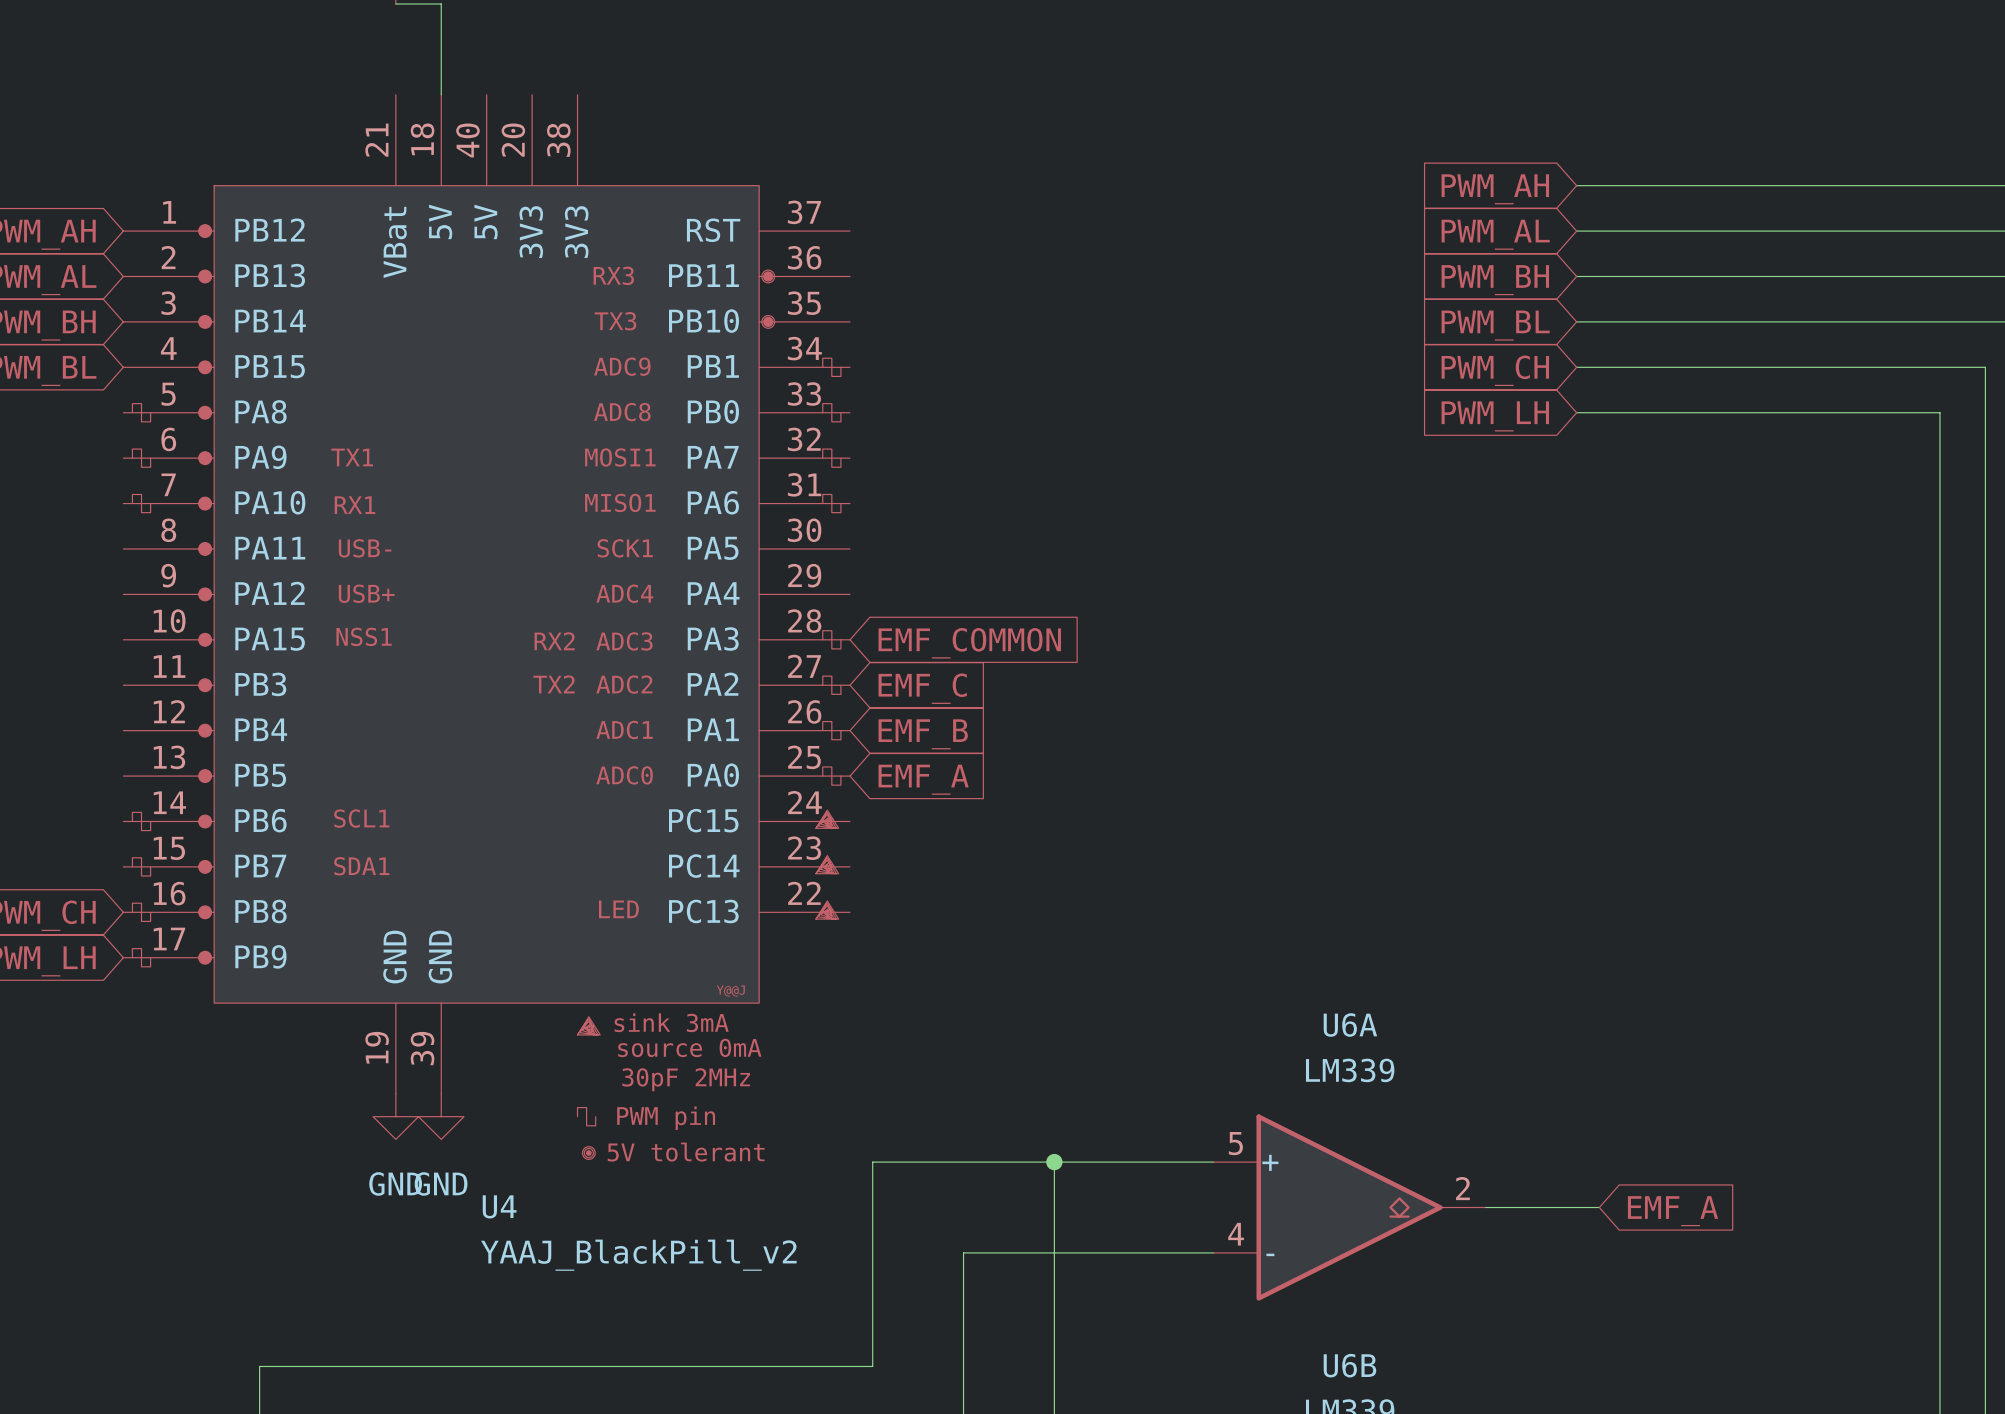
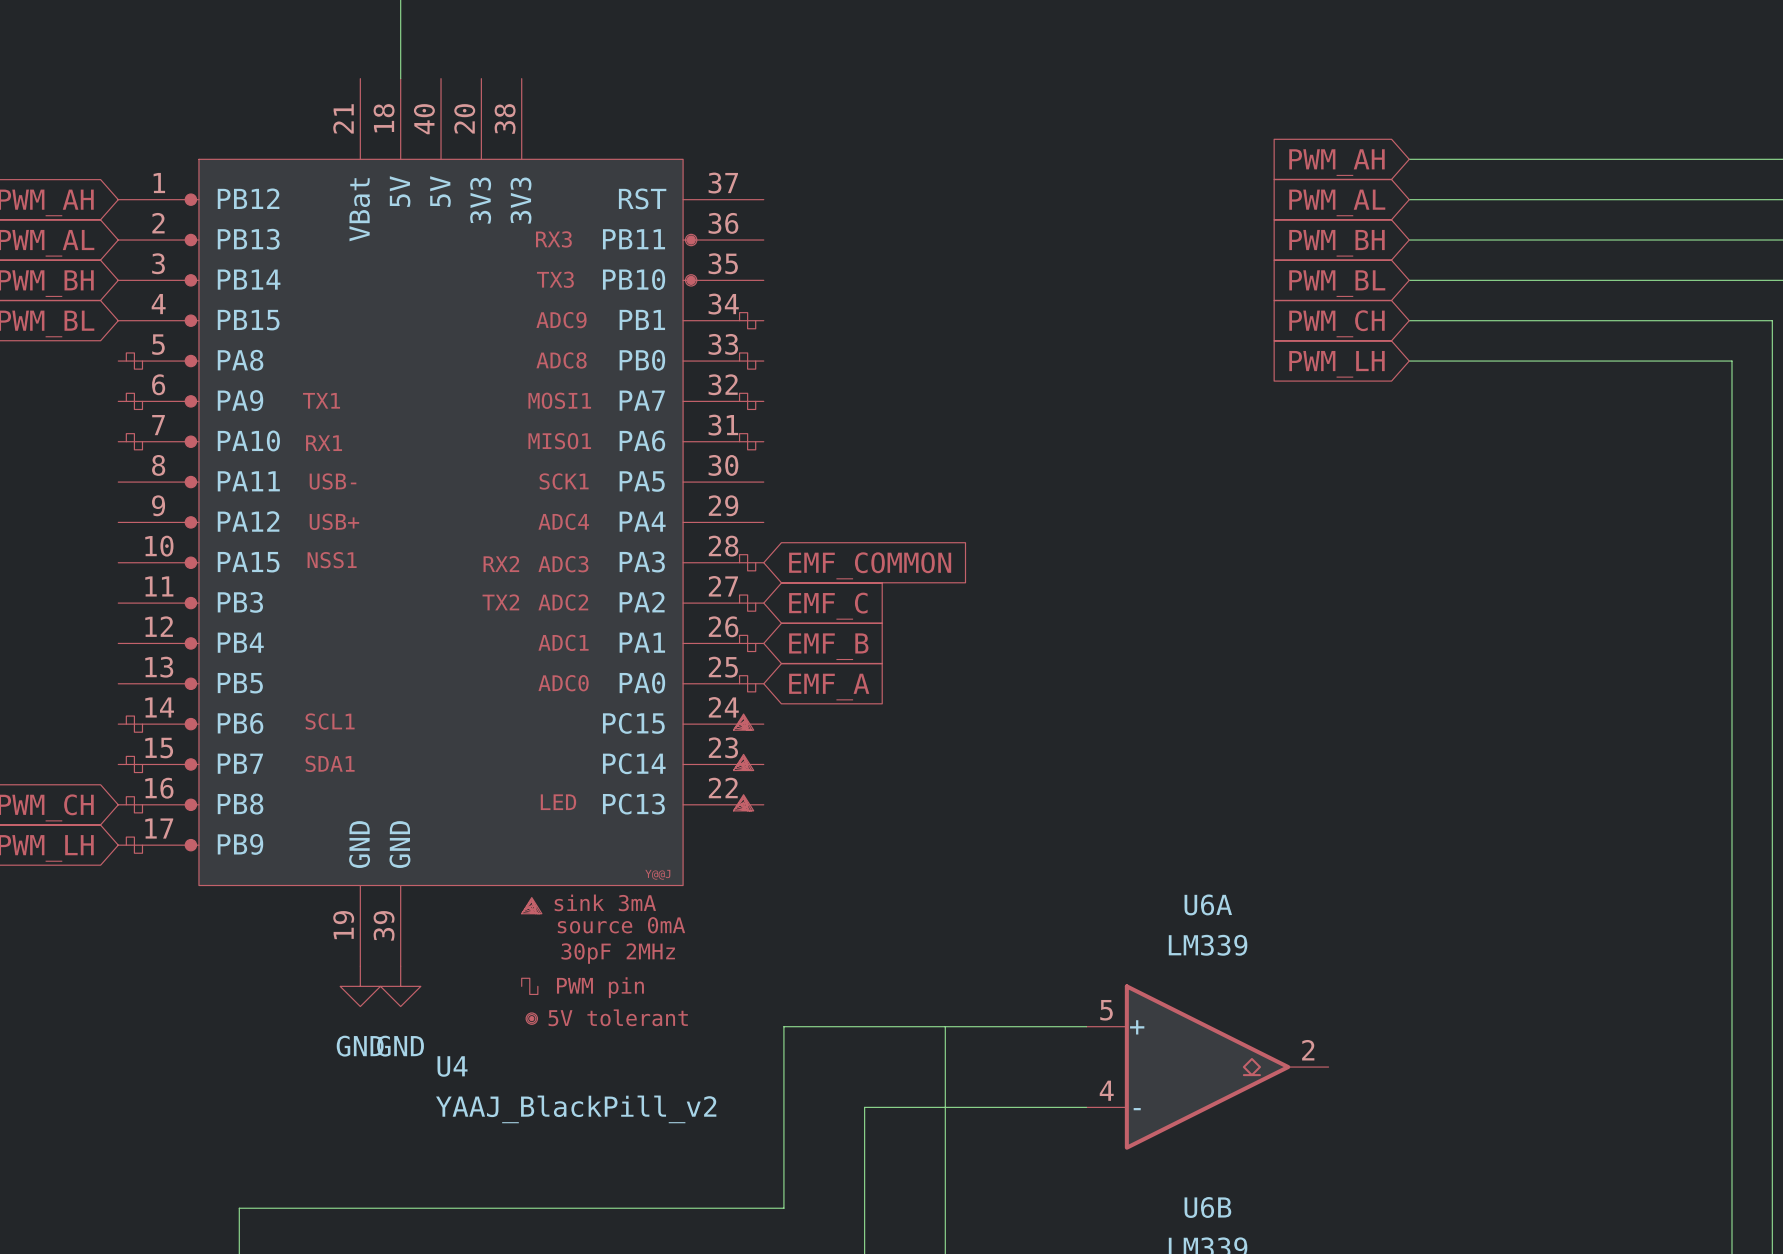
junction: (1054, 1162) -> none
wire: (1485, 1207) (1599, 1207) -> none
global label: EMF_A (1673, 1211) -> none

